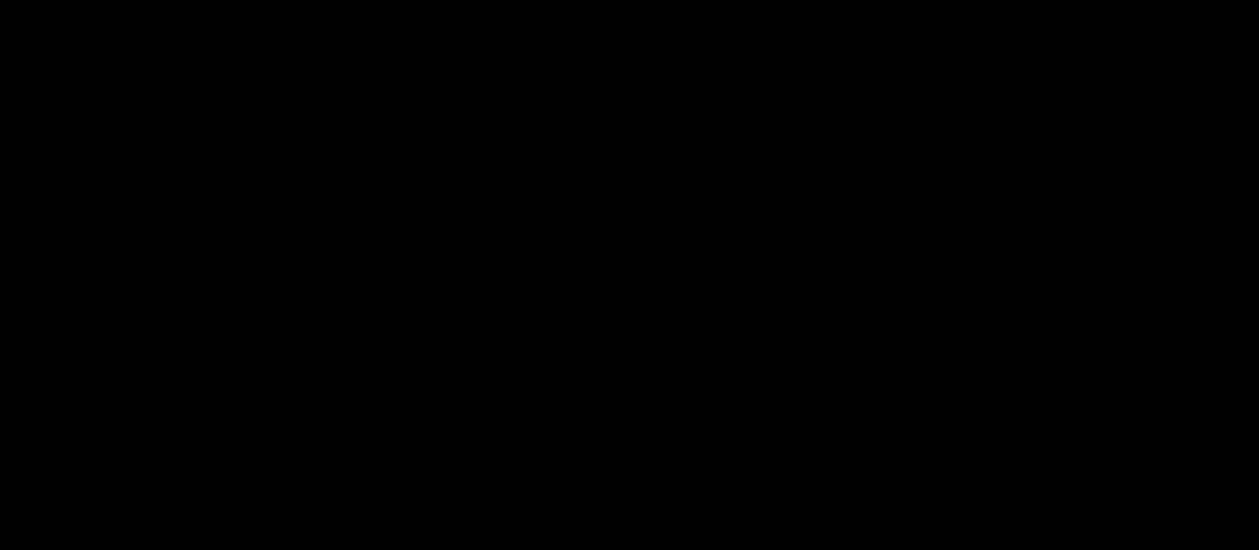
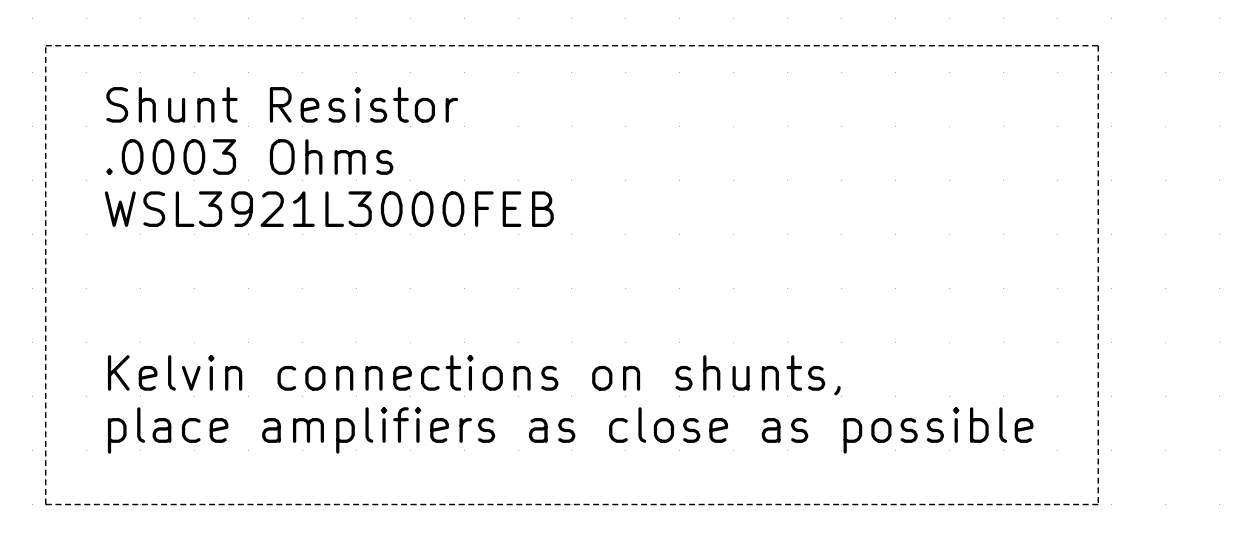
line: none -> (45, 45) (1098, 45) (1098, 504) (45, 504) (45, 45)
text: none -> Shunt Resistor (282, 104)
text: none -> .0003 Ohms (249, 157)
text: none -> WSL3921L3000FEB (329, 209)
text: none -> Kelvin connections on shunts, (474, 375)
text: none -> place amplifiers as close as possible (570, 430)

